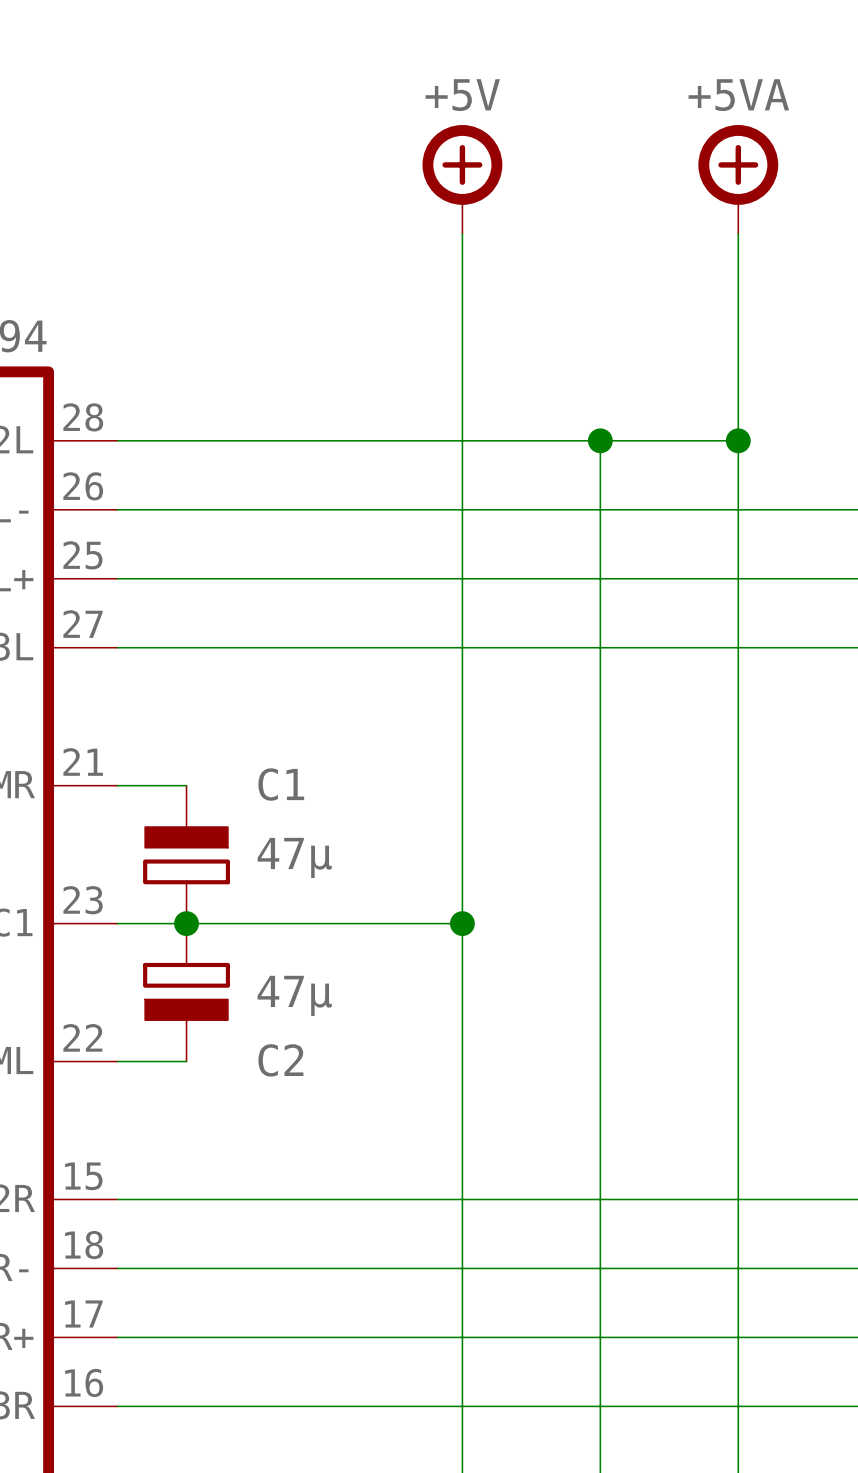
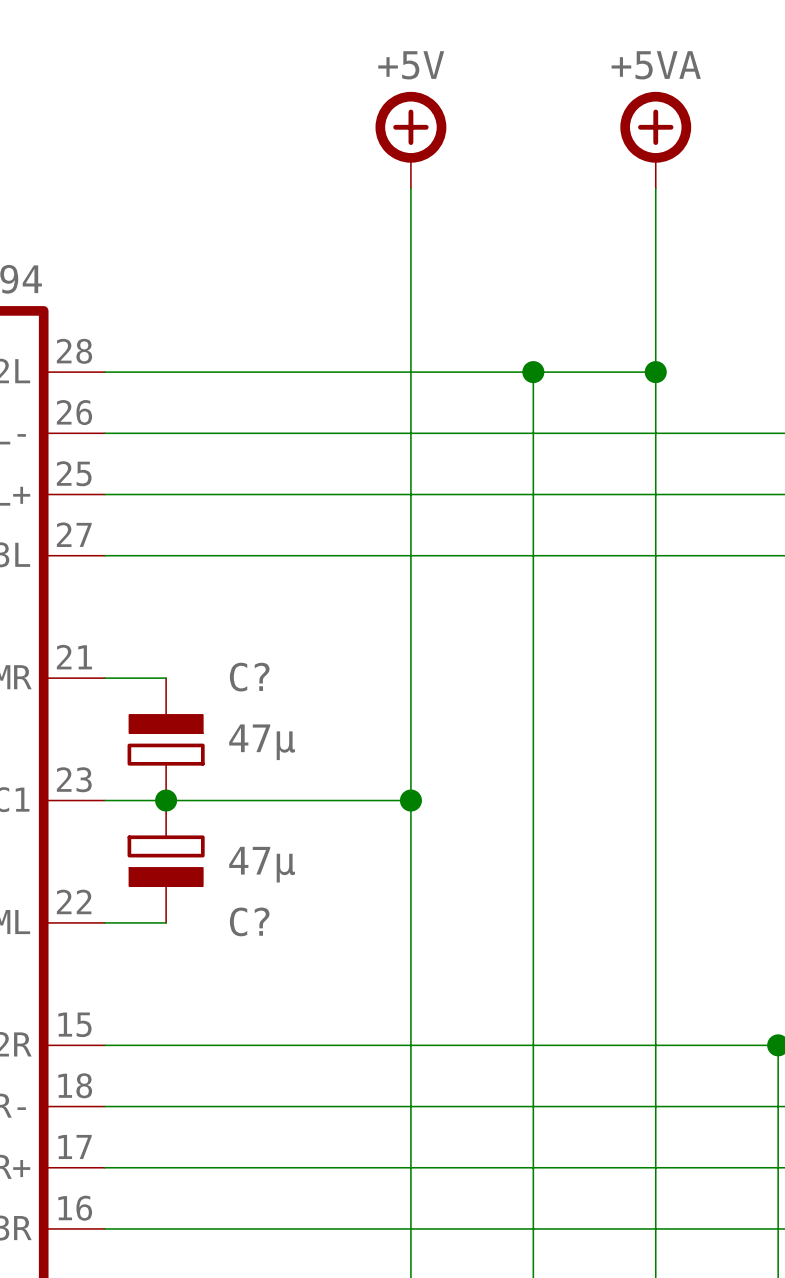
C1 name: C1 (281, 784) -> C? (249, 677)
C2 name: C2 (280, 1060) -> C? (249, 921)

